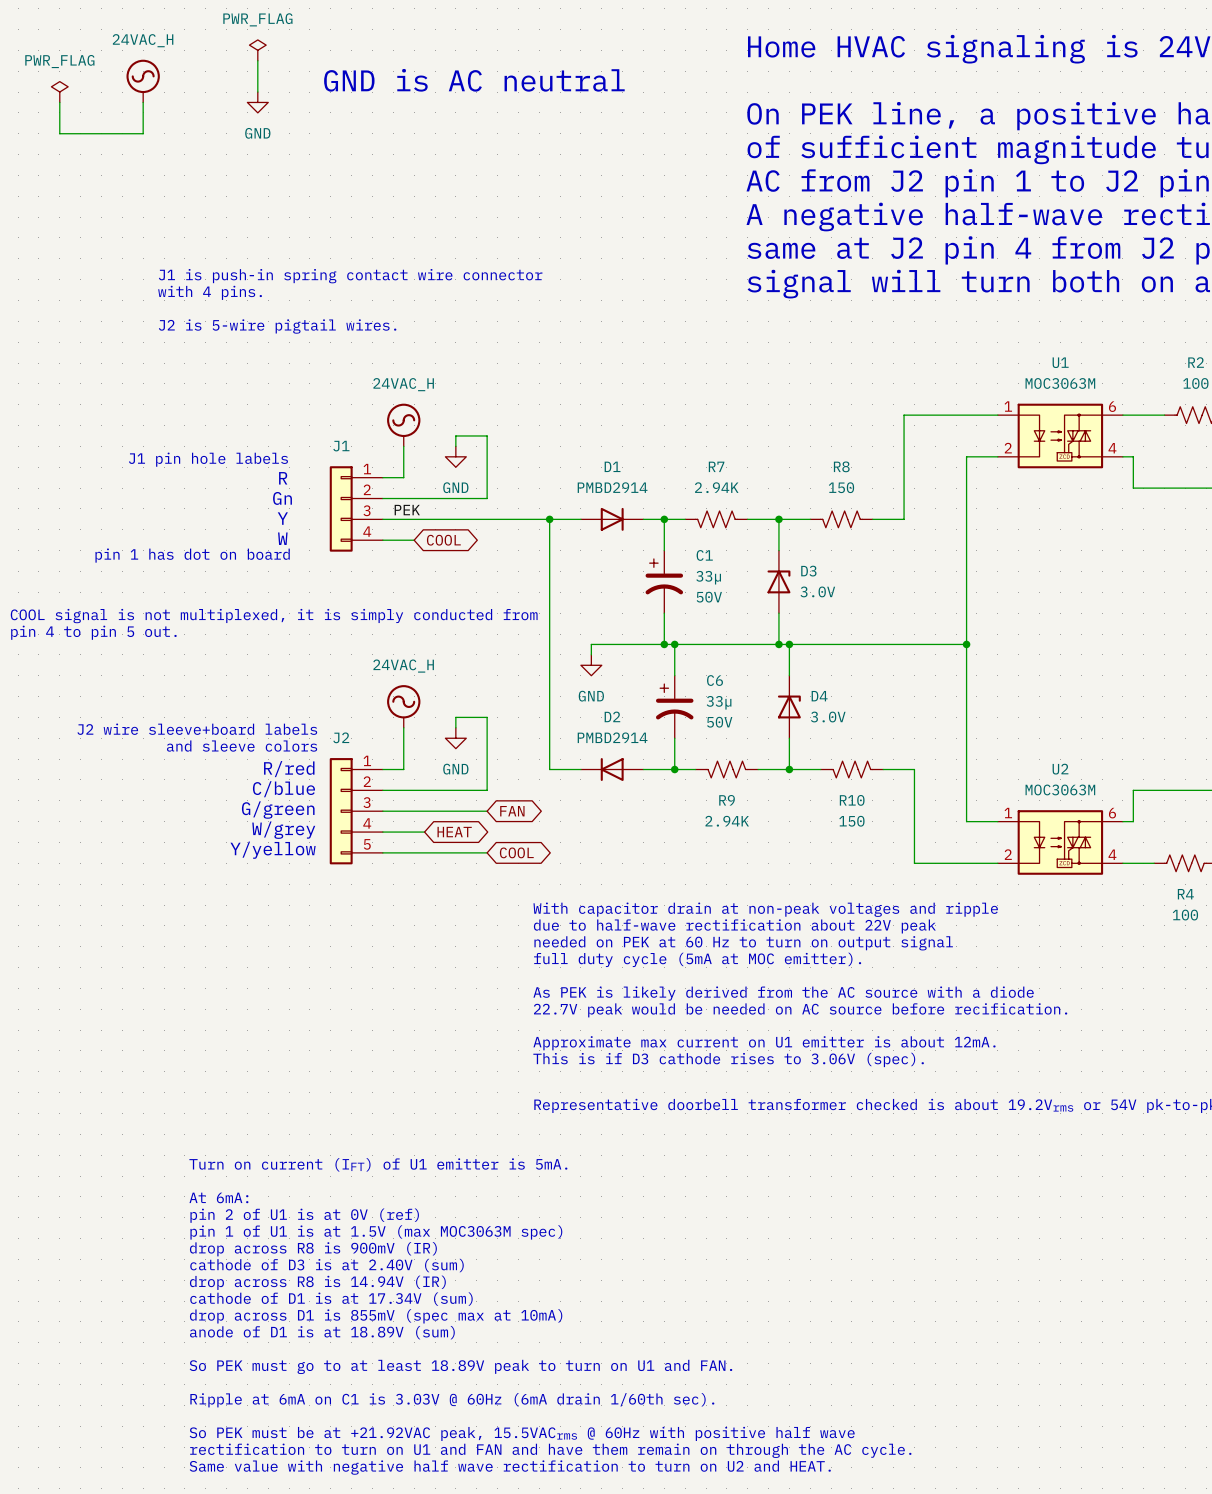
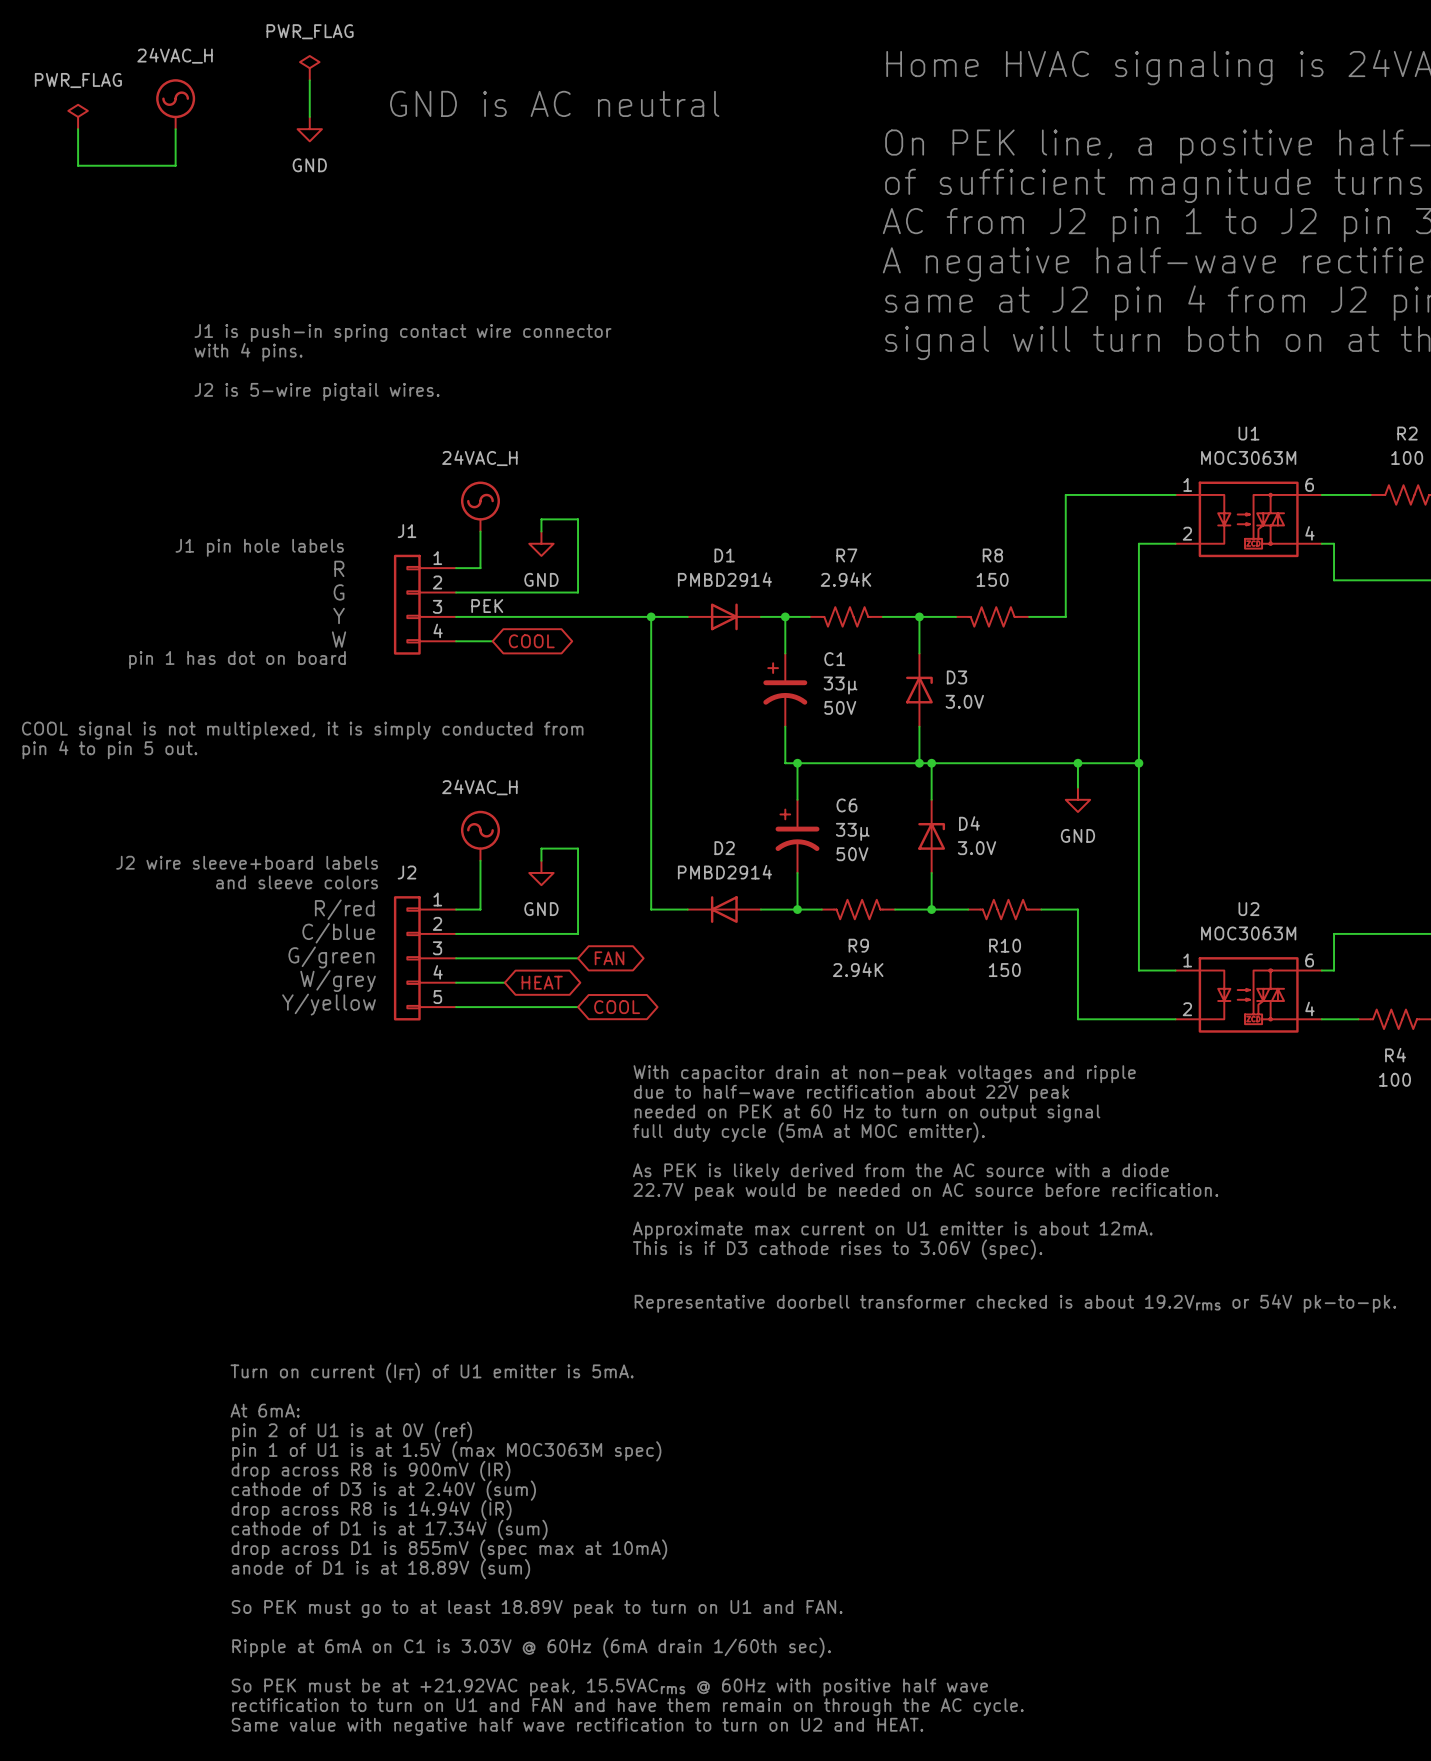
text: Gn (282, 498) -> G (339, 592)
wire: (664, 644) (591, 644) (591, 654) -> none
junction: (664, 644) -> none
wire: none -> (1077, 763) (1077, 787)
junction: none -> (1077, 763)
power symbol: GND (591, 665) -> none
power symbol: none -> GND (1077, 799)

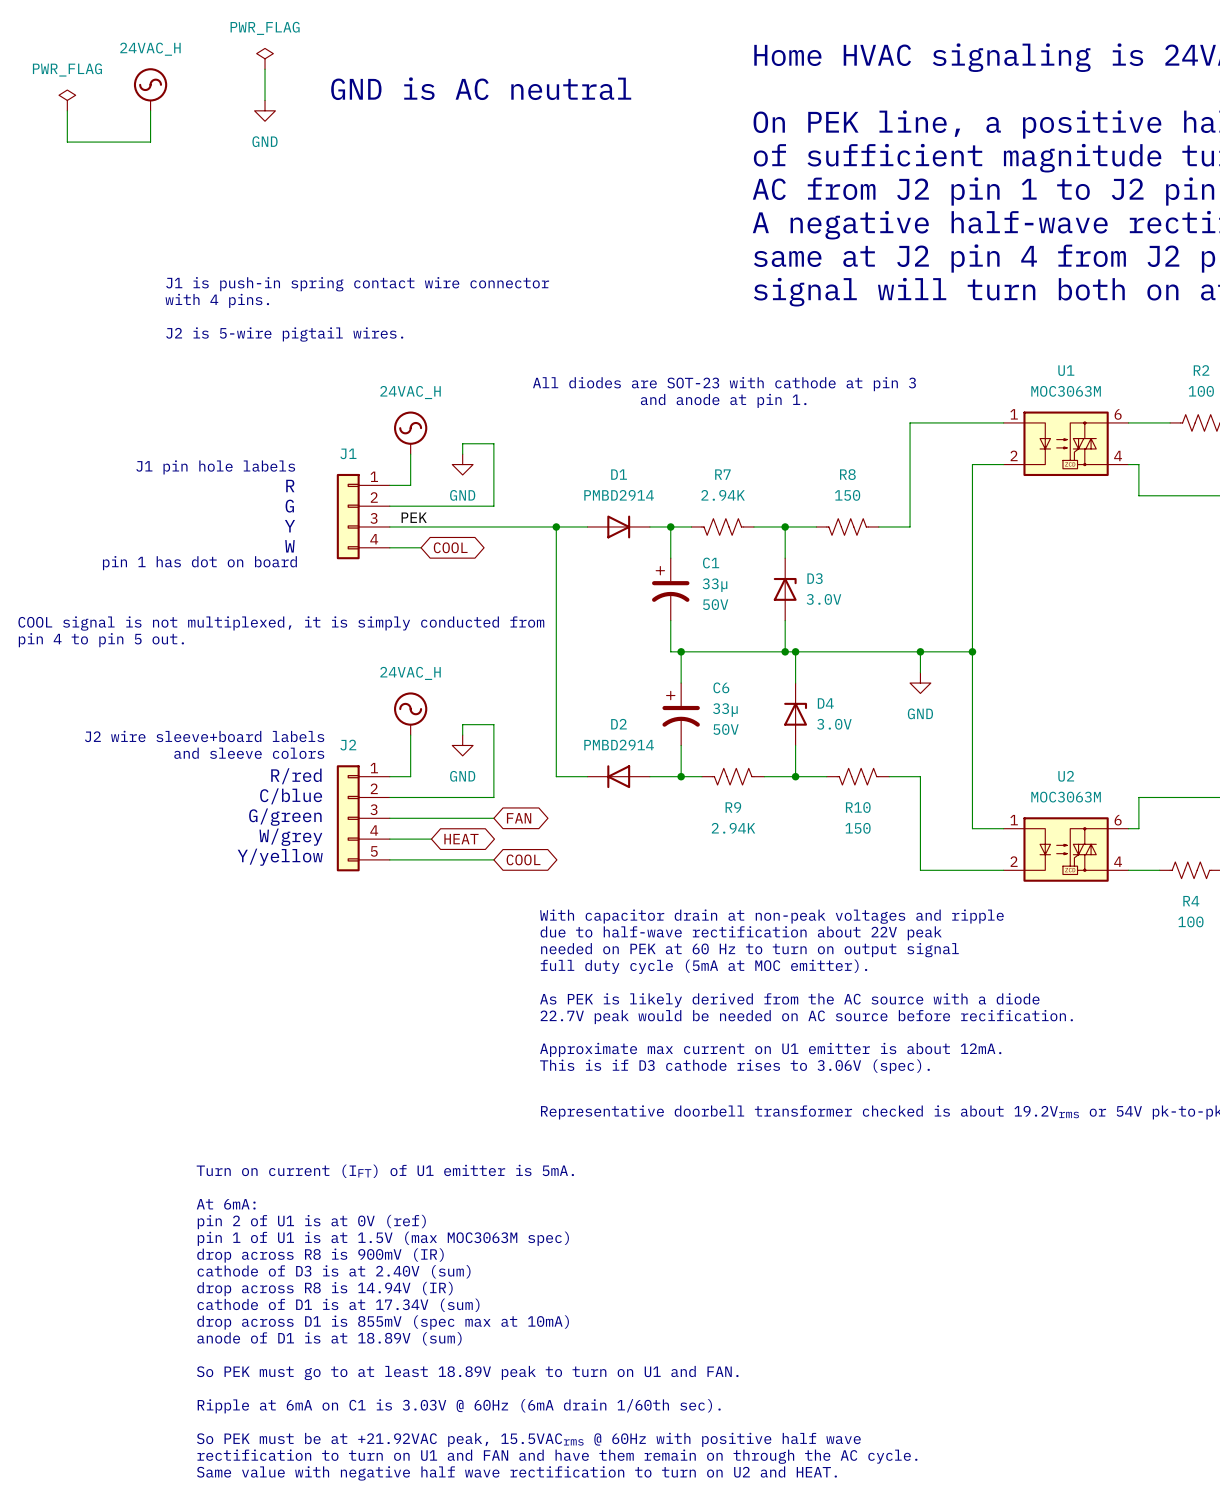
text: none -> All diodes are SOT-23 with cathode at pin 3 (724, 384)
text: none -> and anode at pin 1. (723, 400)

